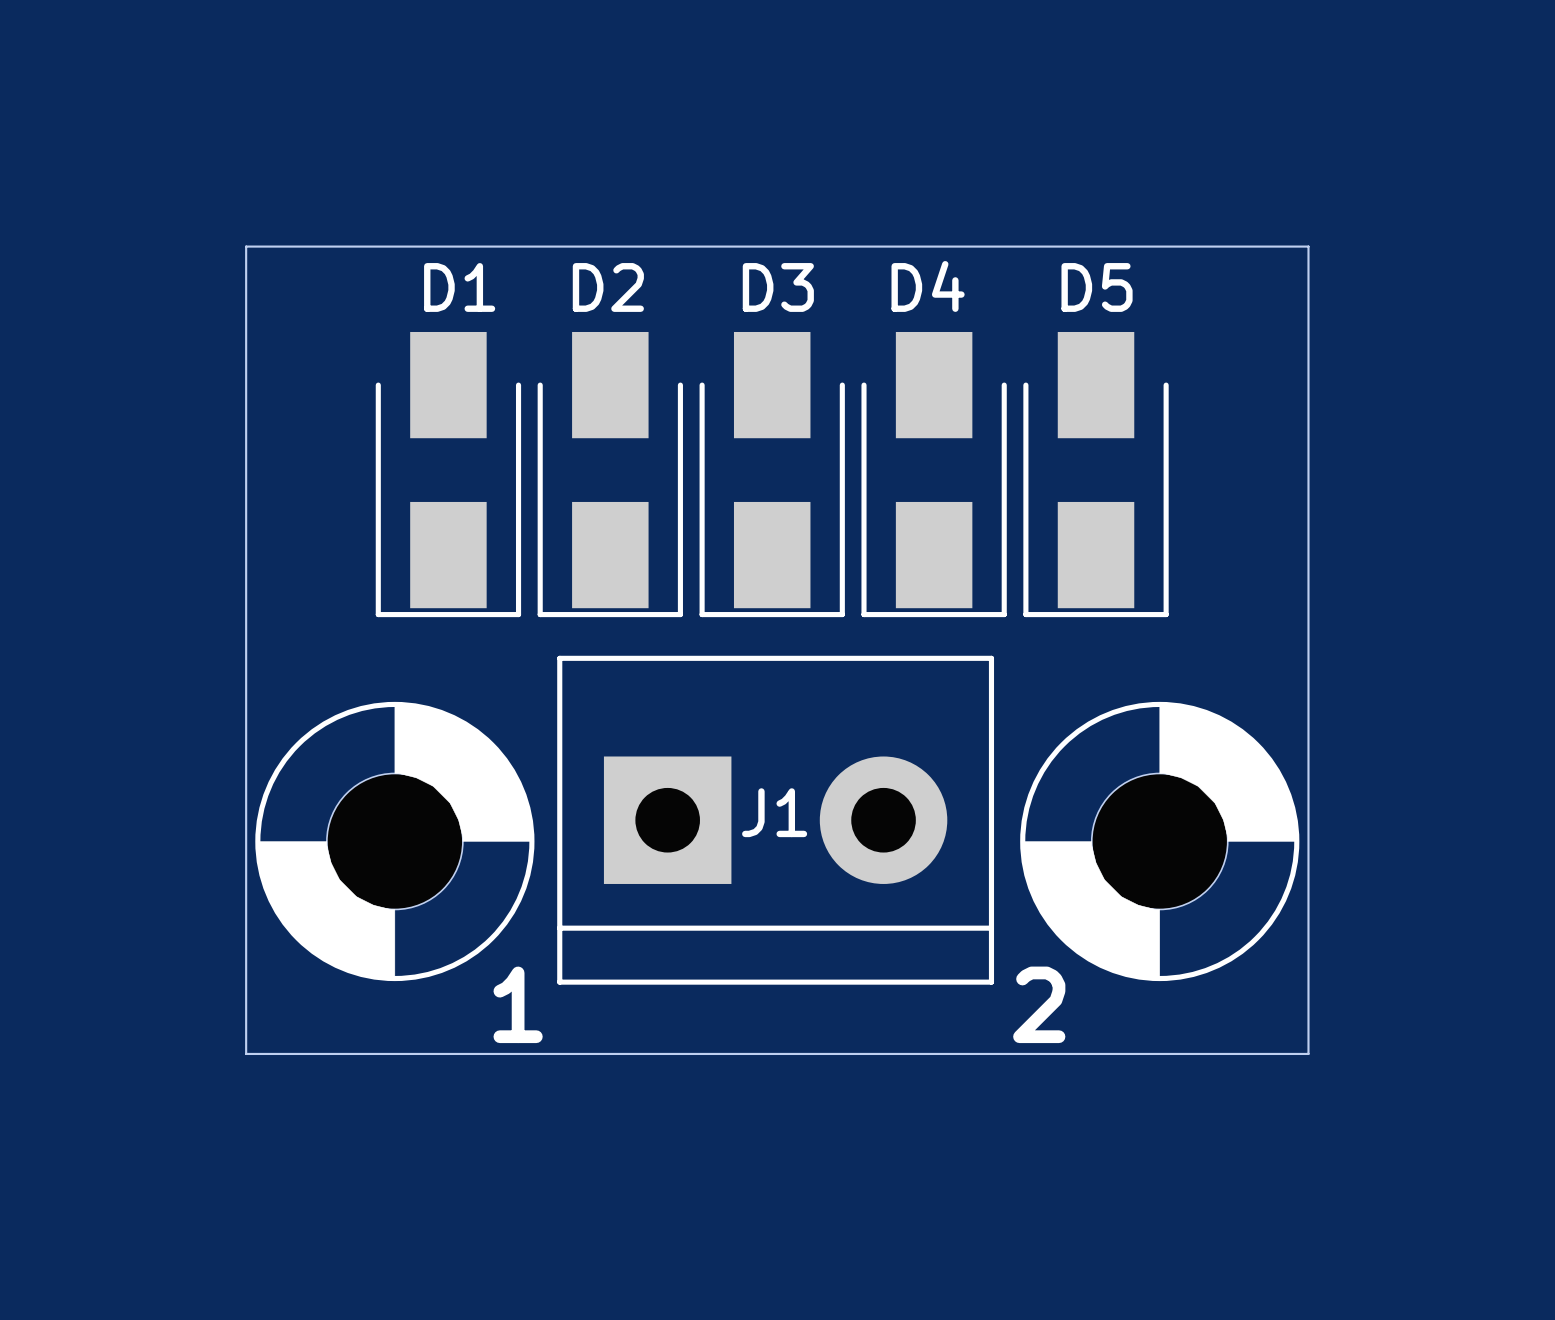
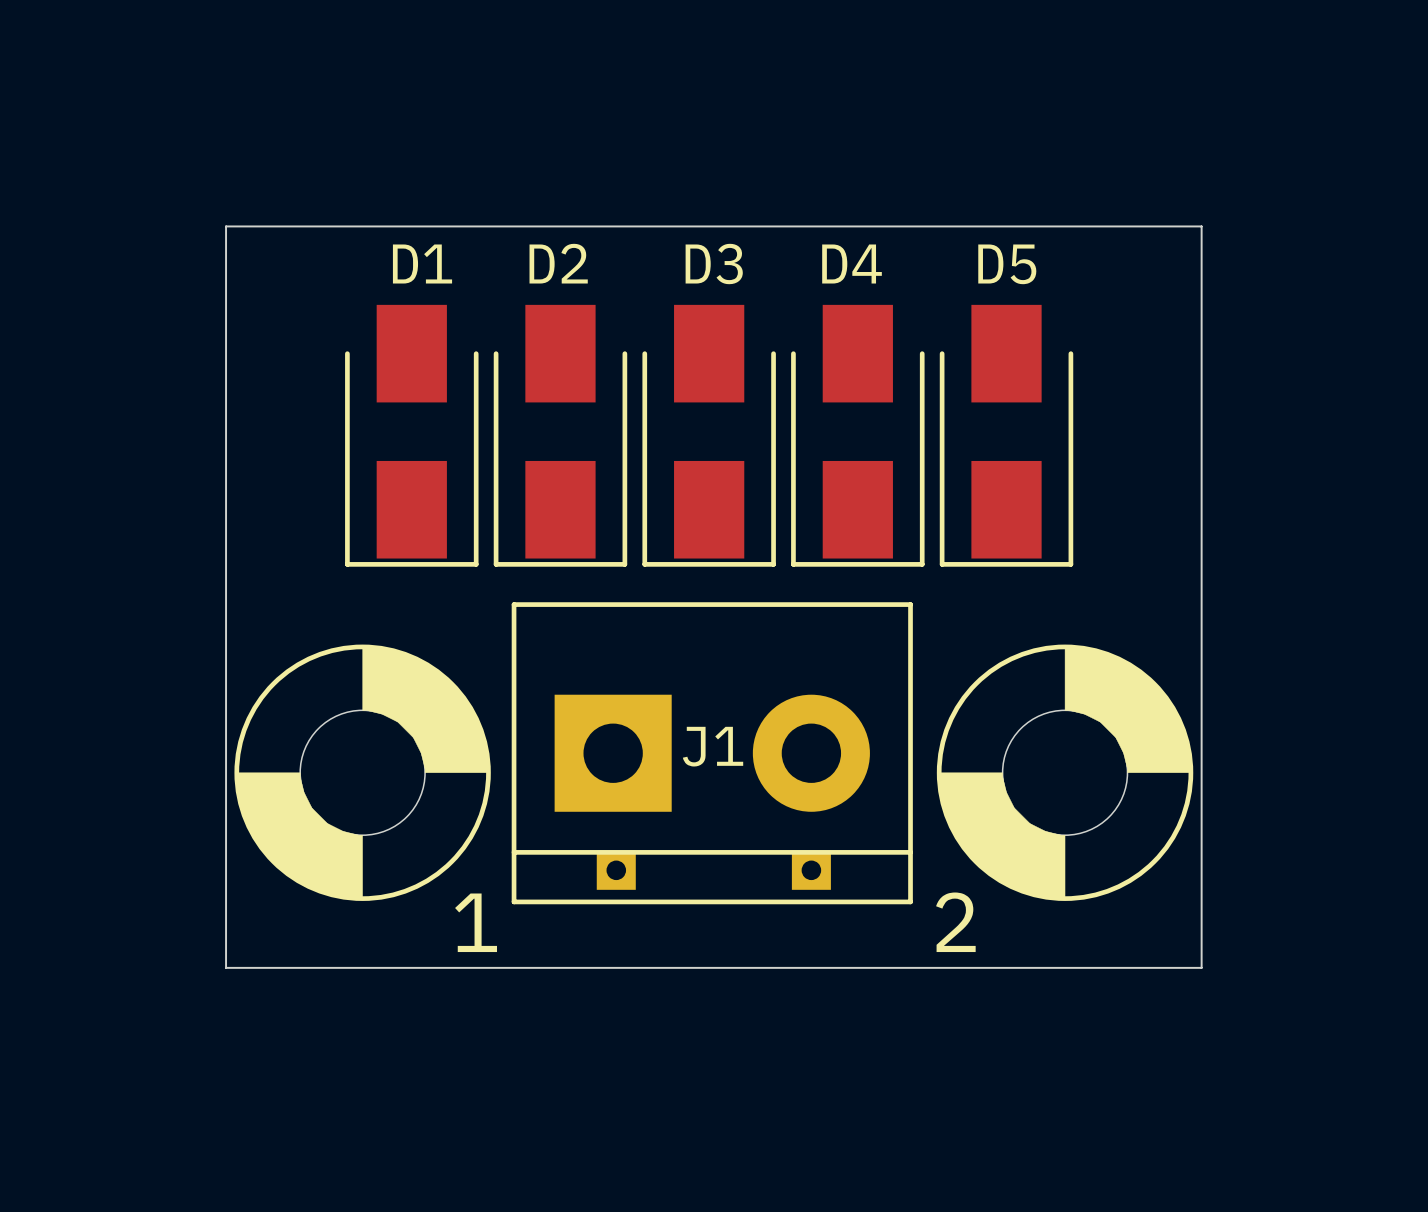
part: none -> (616, 870)
part: none -> (811, 870)

